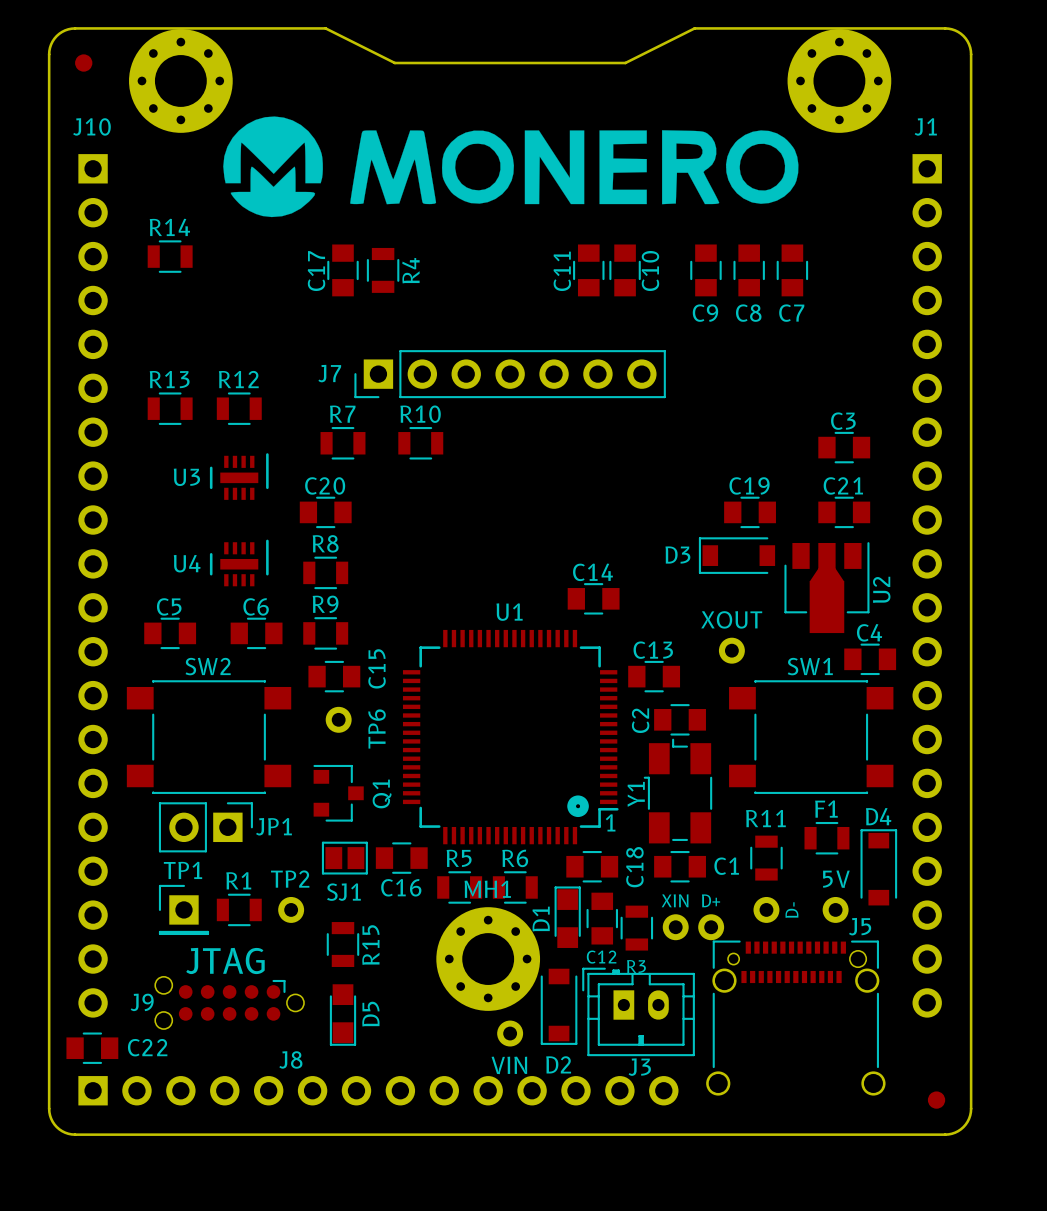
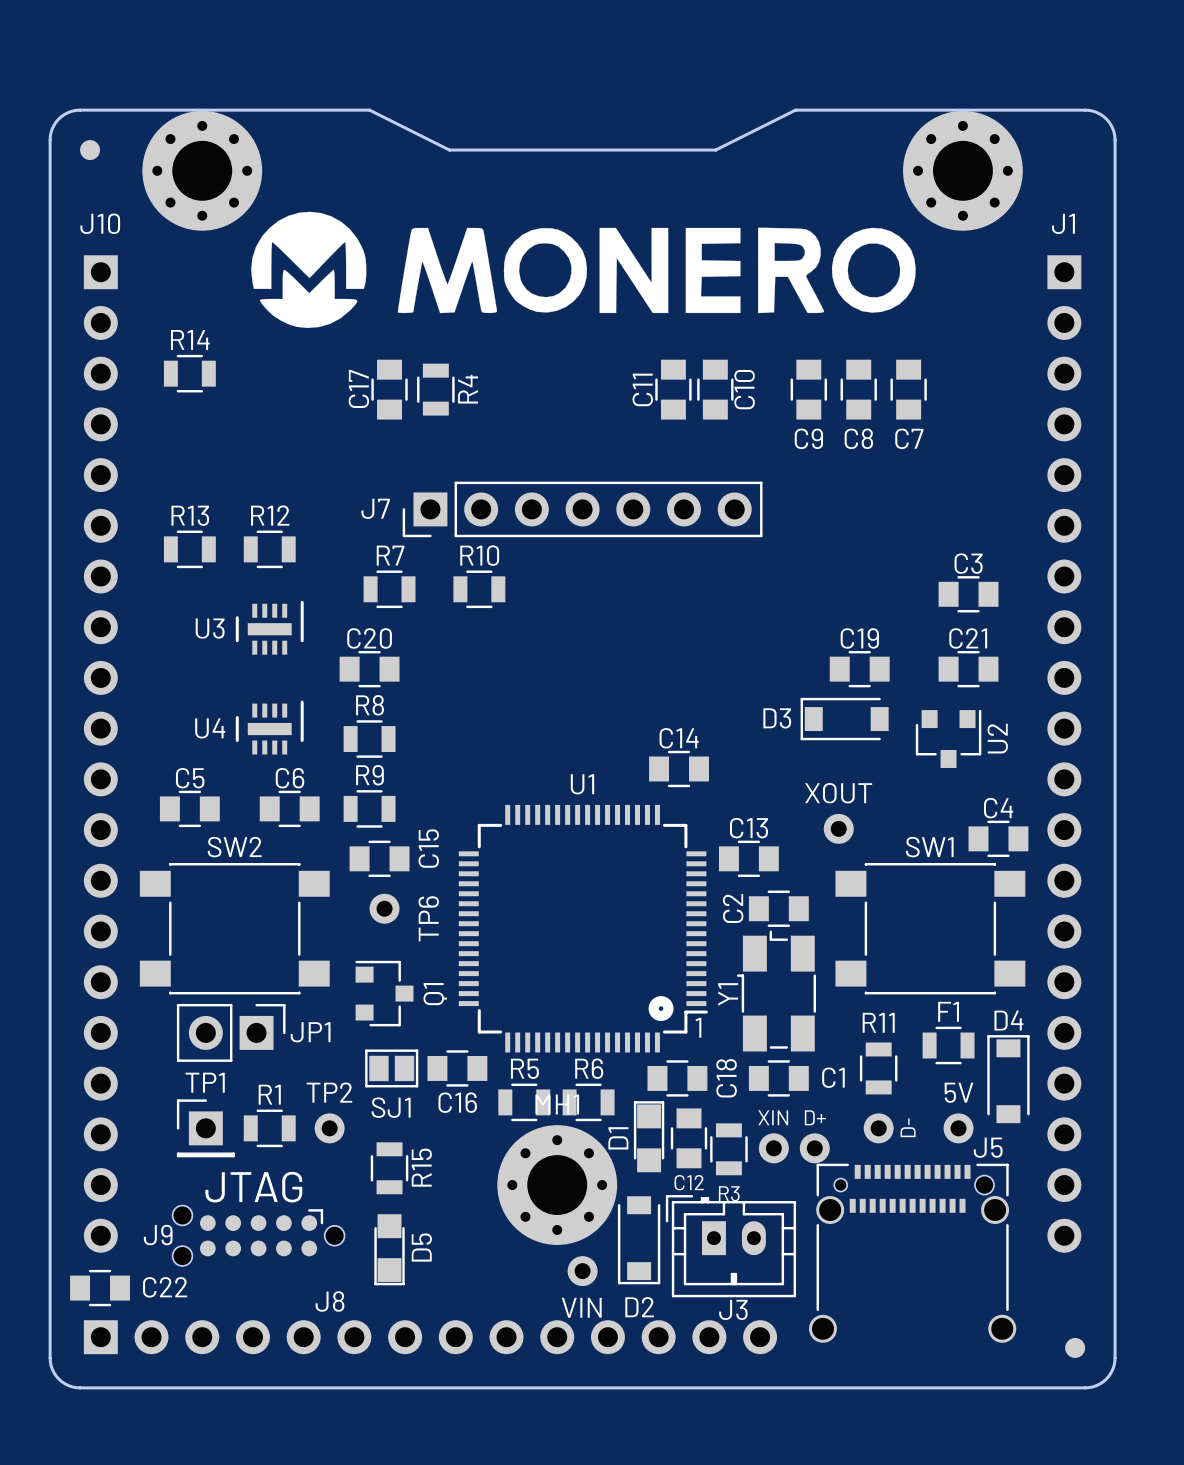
U2 footprint: [784, 542, 870, 634] -> [915, 709, 982, 768]

